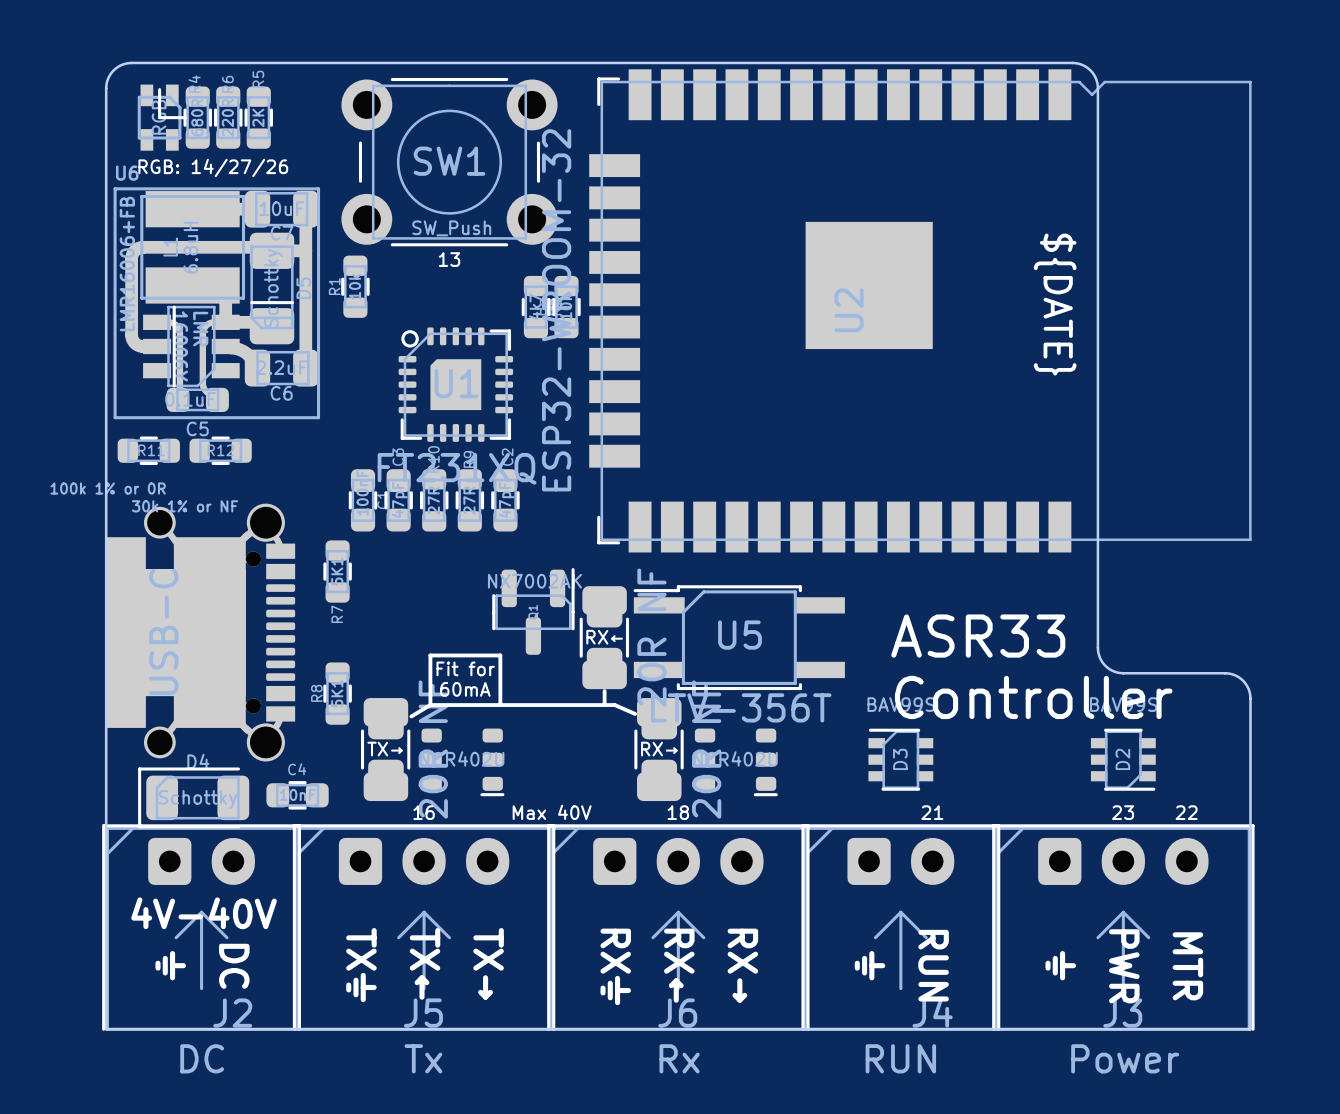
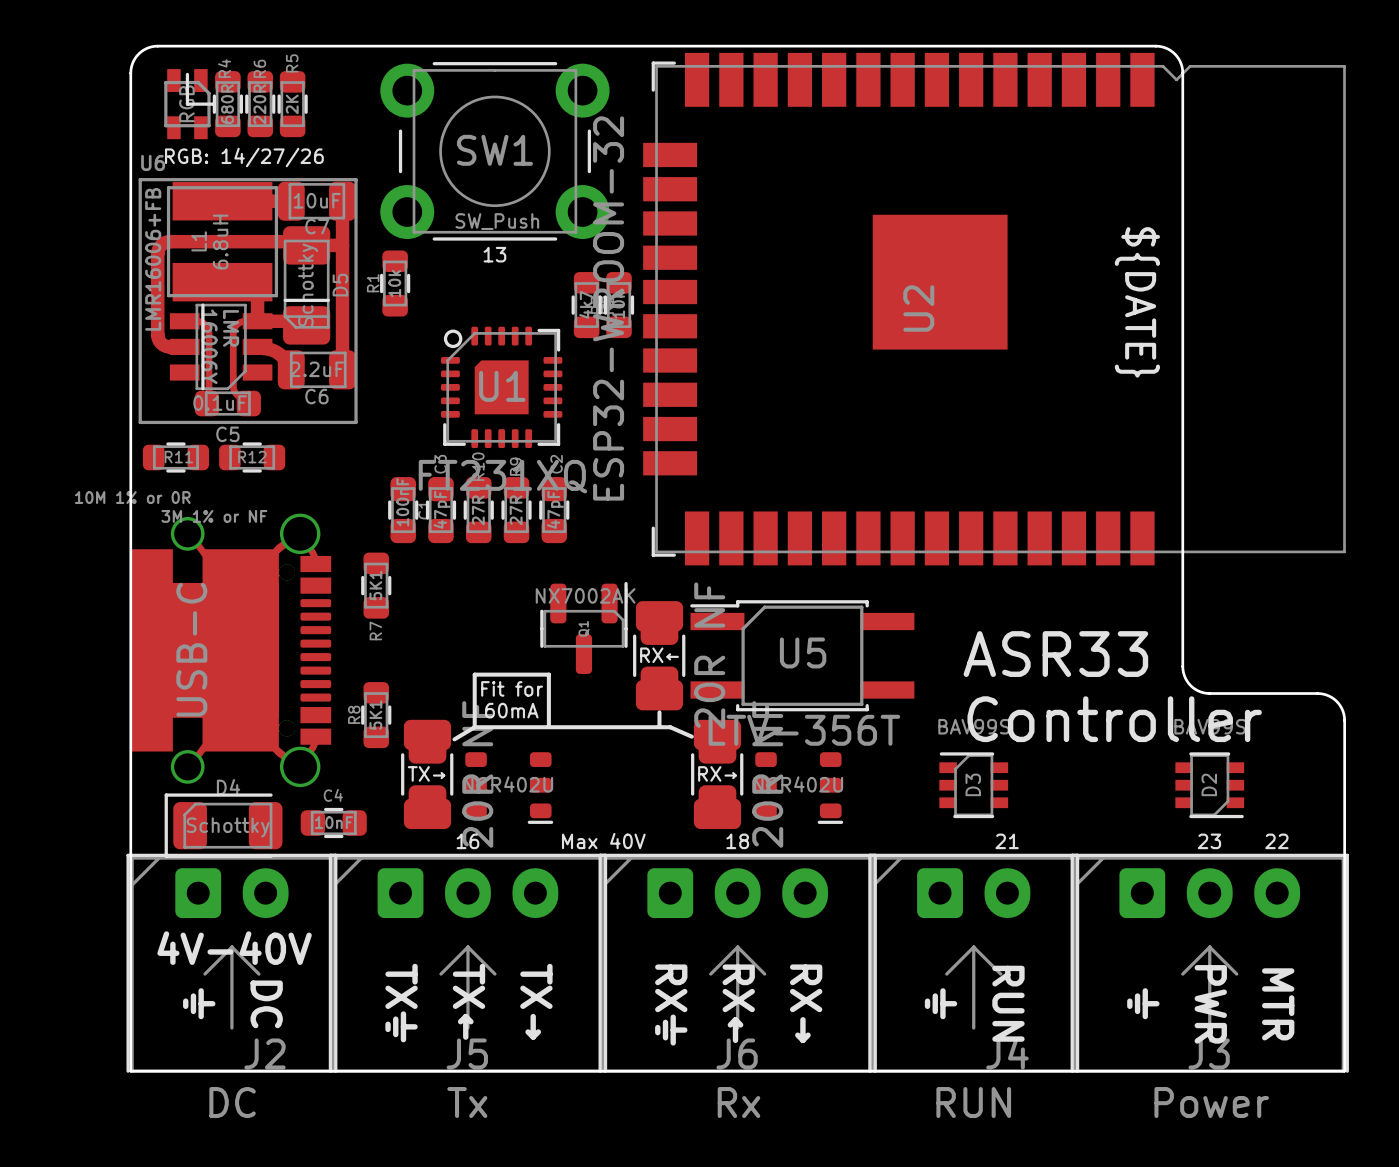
R11 value: 100k 1% or 0R (108, 488) -> 10M 1% or 0R (132, 497)
R12 value: 30k 1% or NF (185, 506) -> 3M 1% or NF (214, 516)

